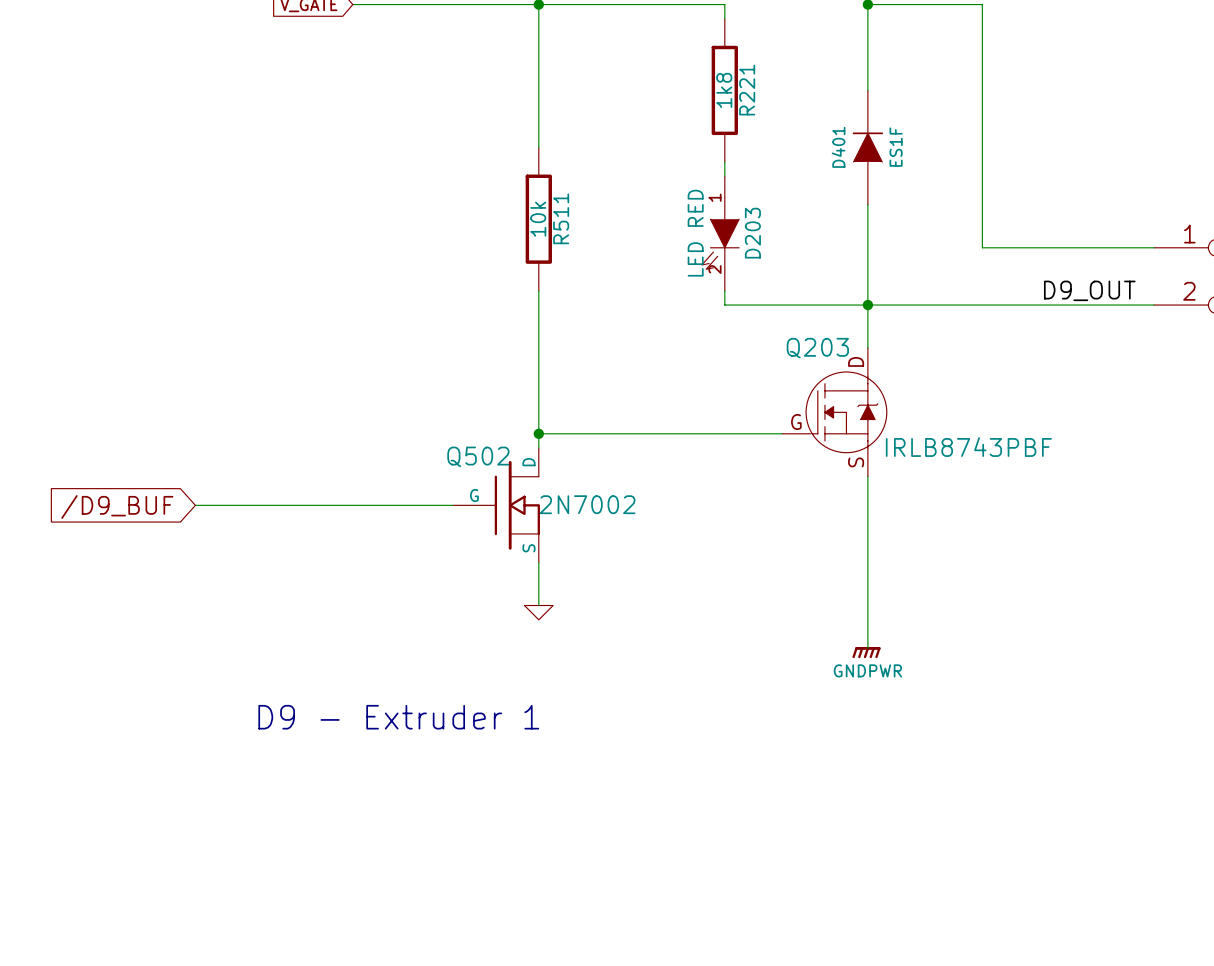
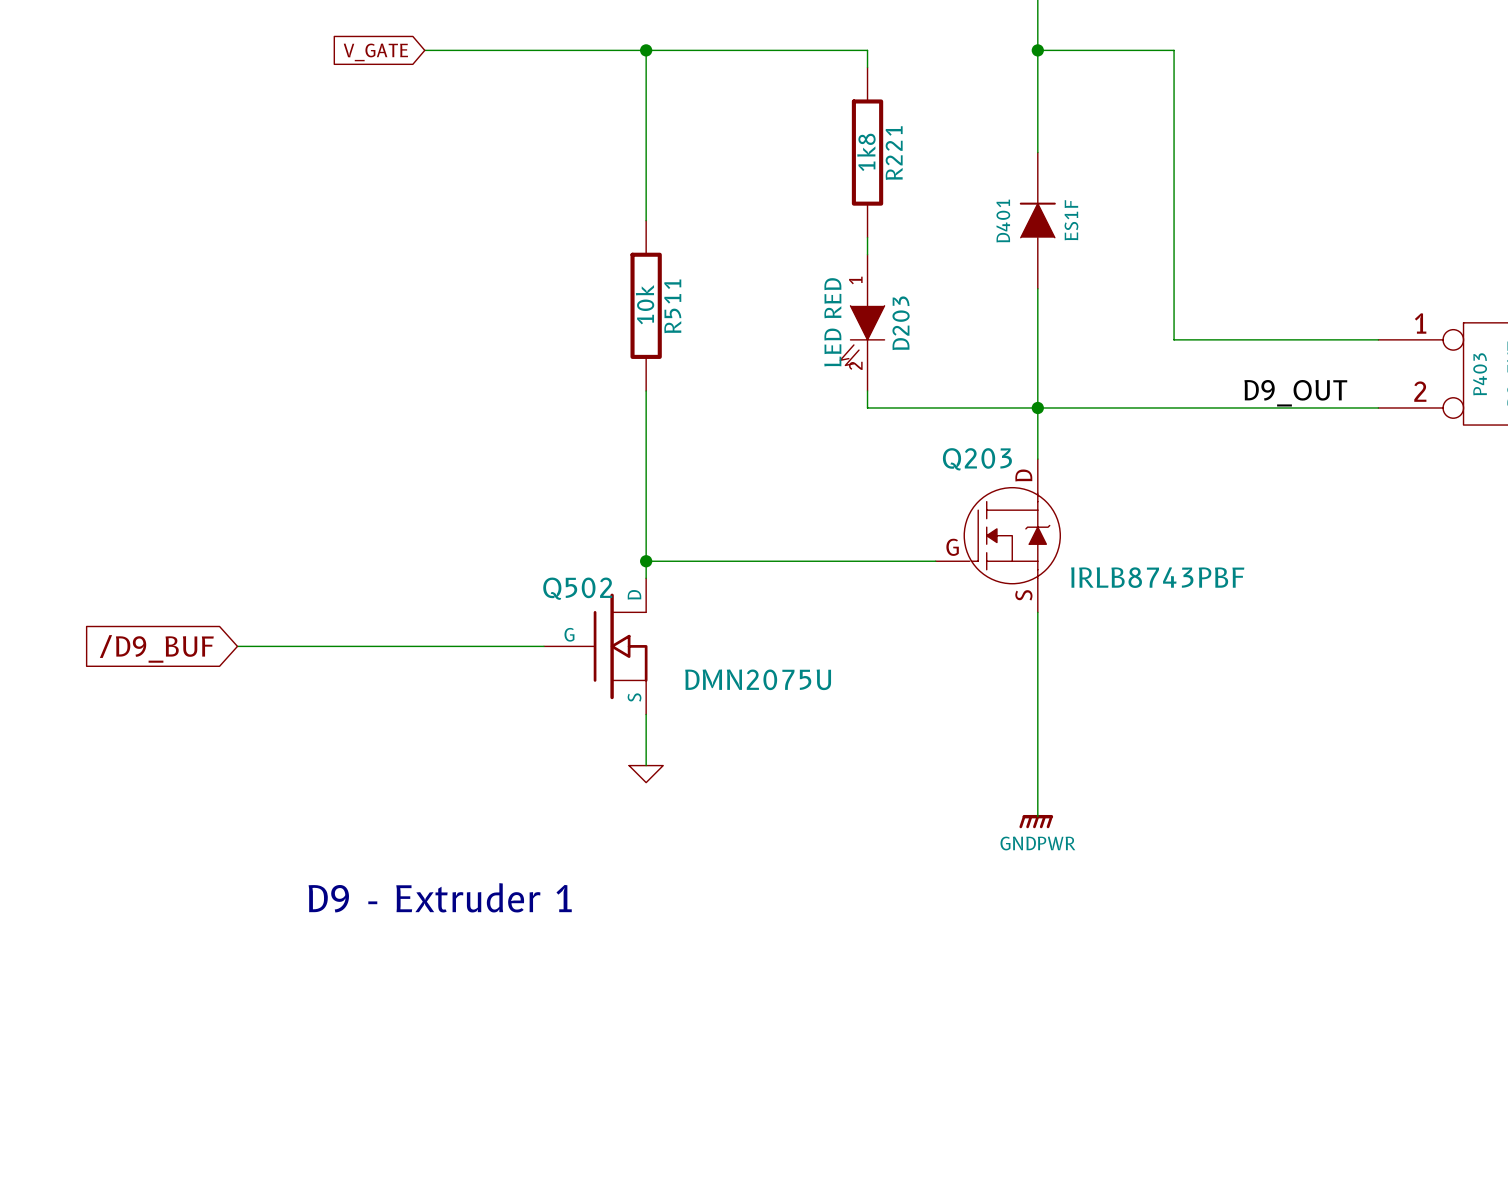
Q502 value: 2N7002 (587, 504) -> DMN2075U (758, 679)

